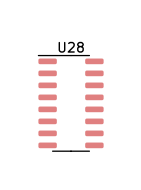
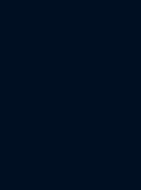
U28: (70, 103) -> none

